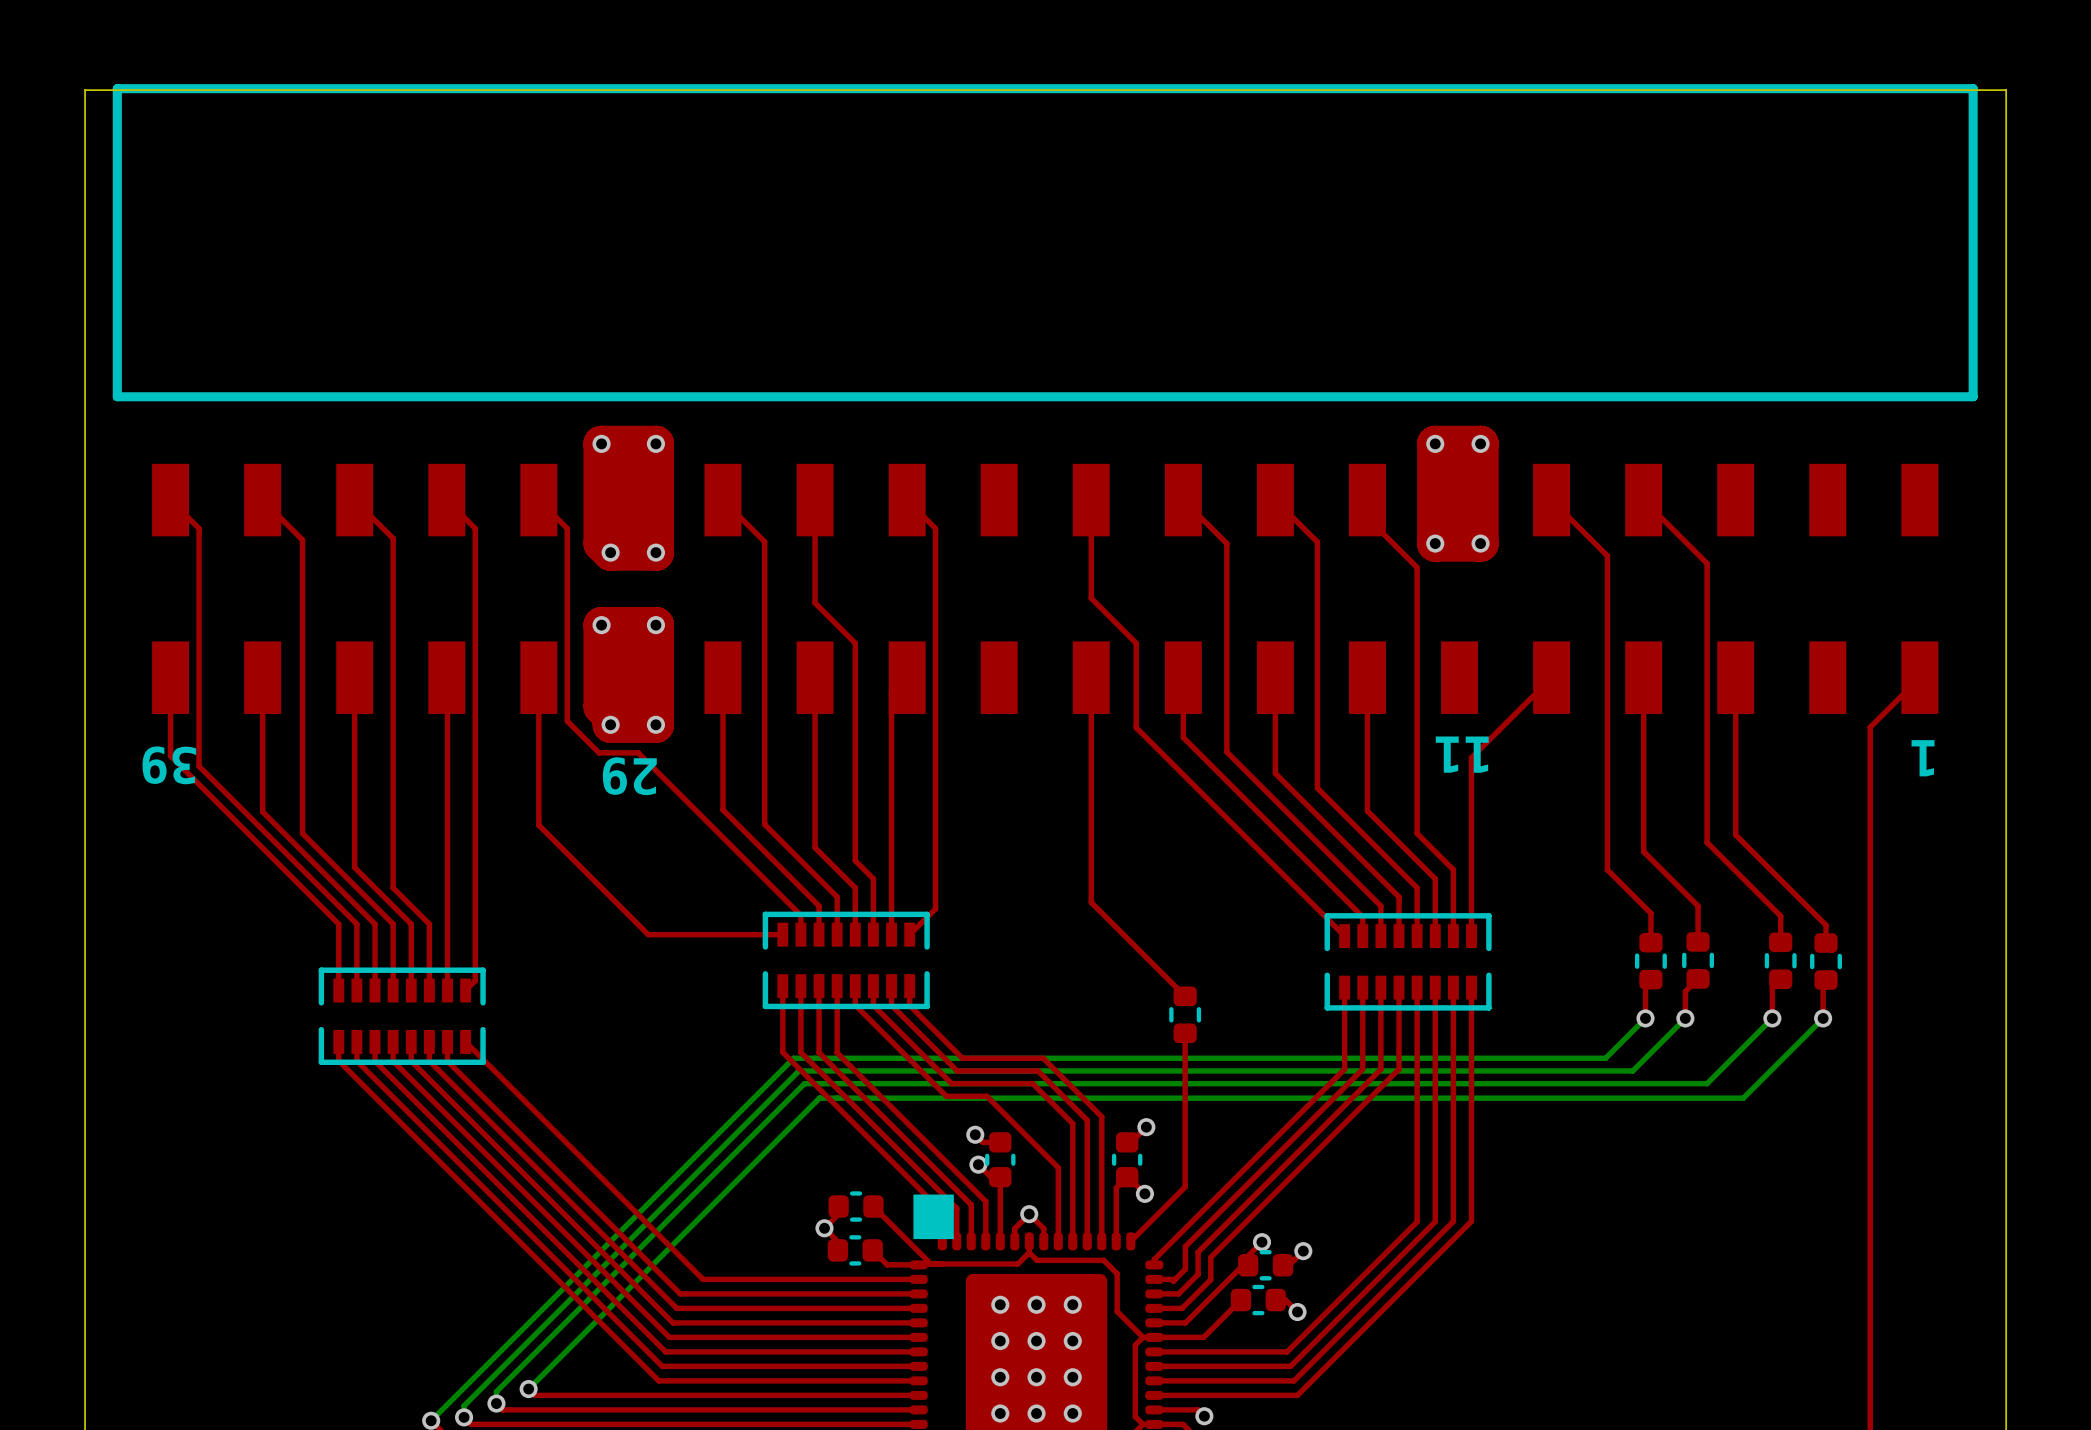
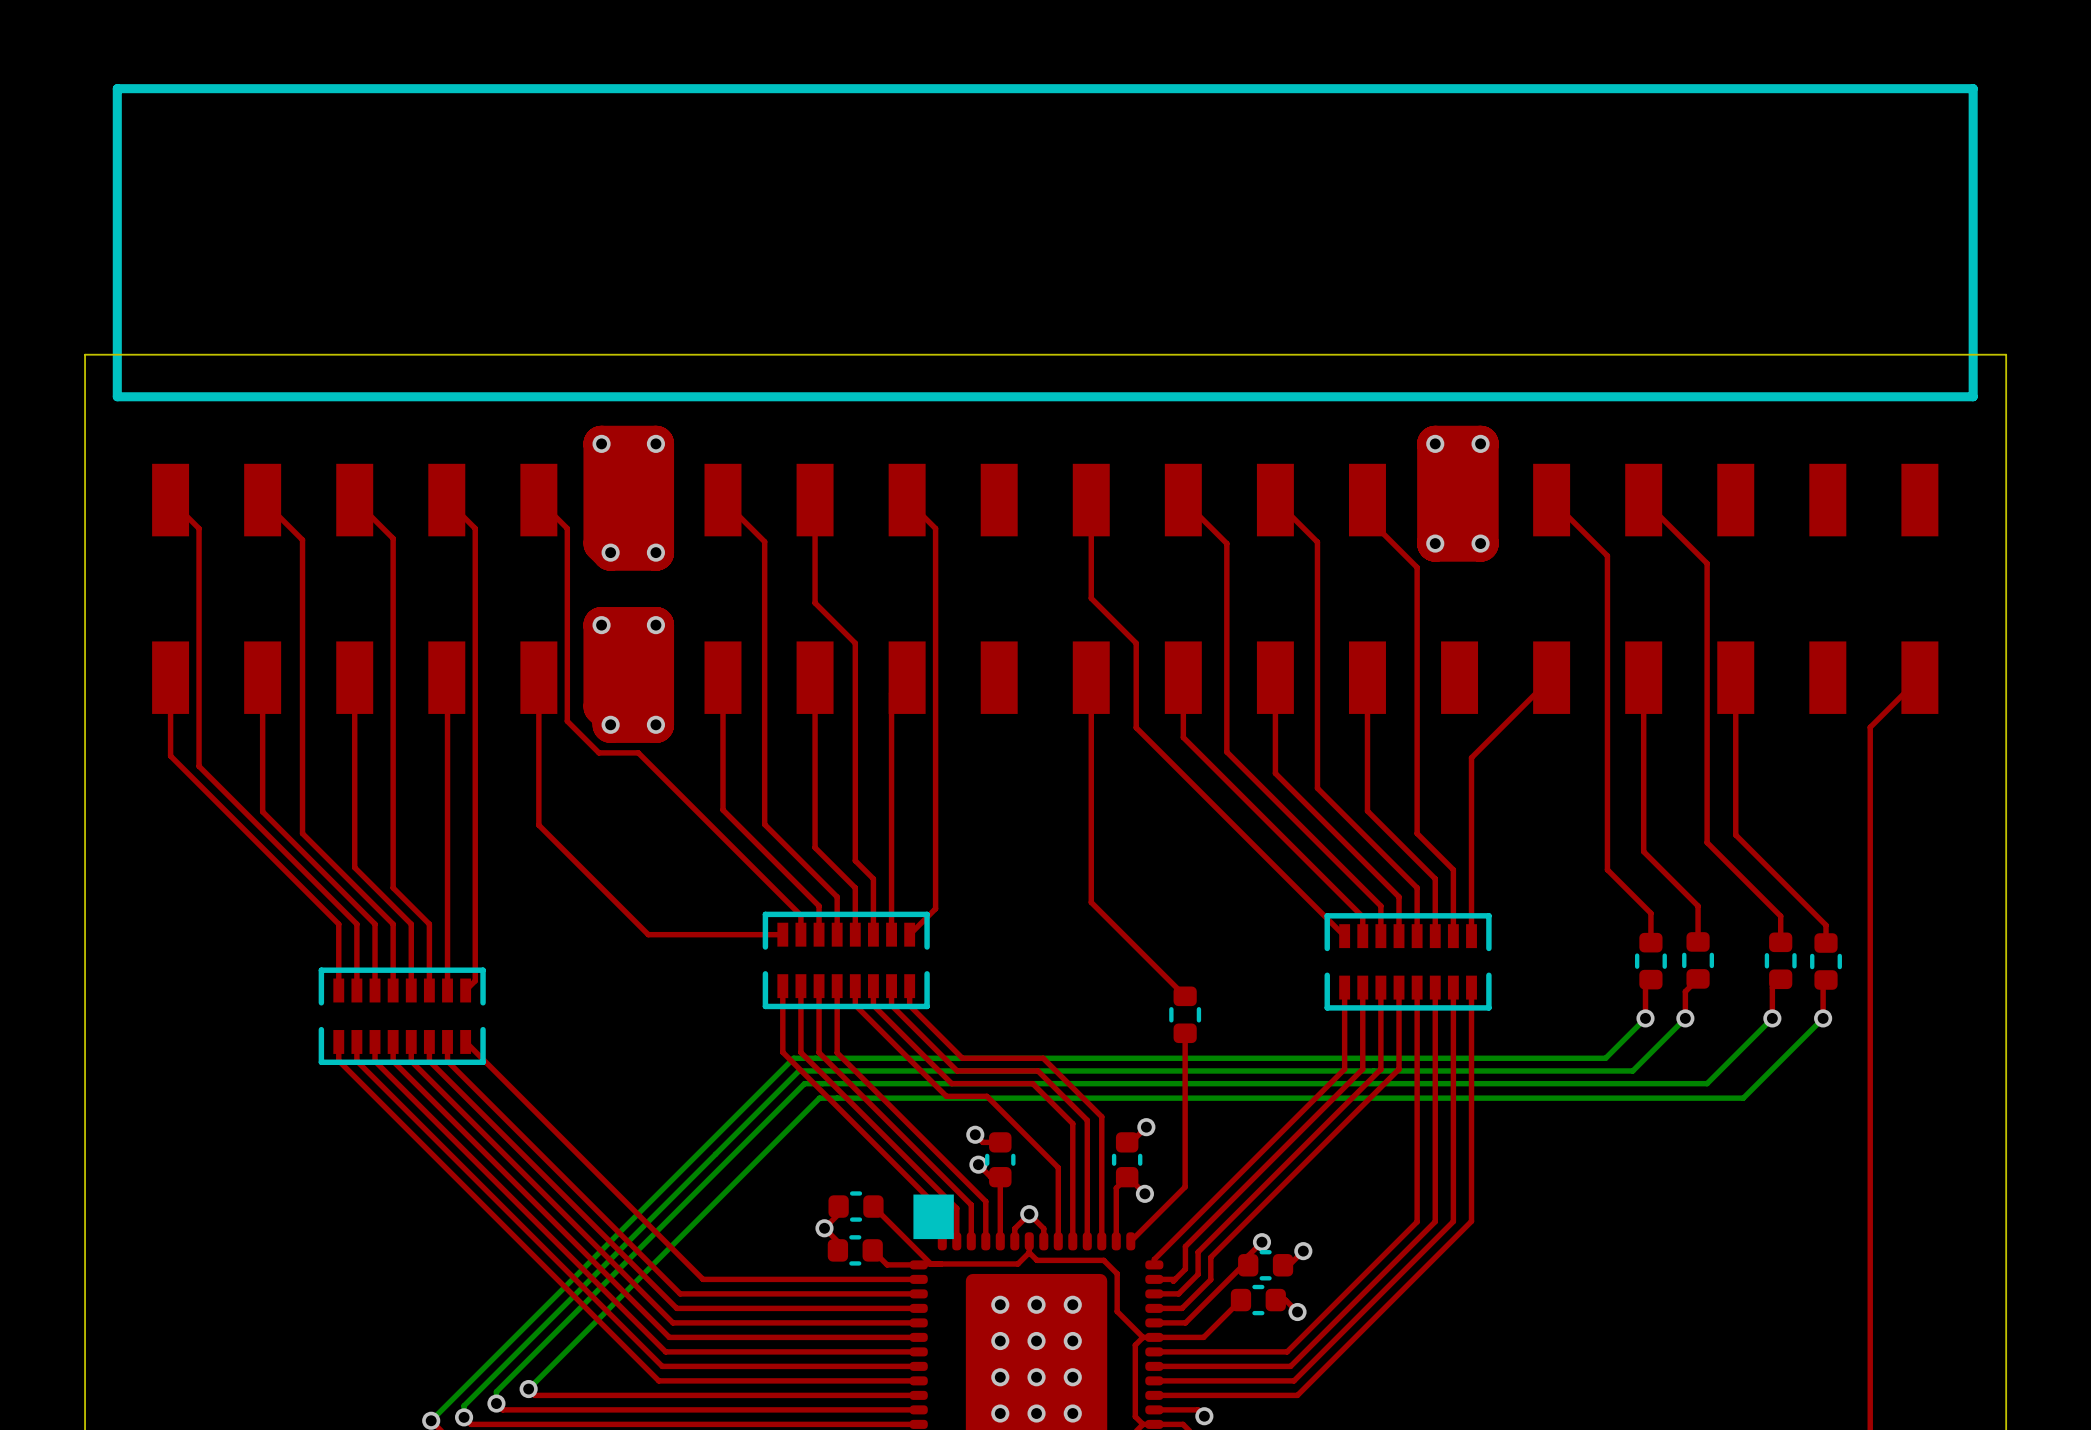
board edge: (85, 354) (85, 90) (2006, 90) (2006, 354) -> (85, 354) (2006, 354)
text: 11 (1462, 754) -> none
text: 1 (1923, 758) -> none
text: 39 (169, 765) -> none
text: 29 (629, 776) -> none

